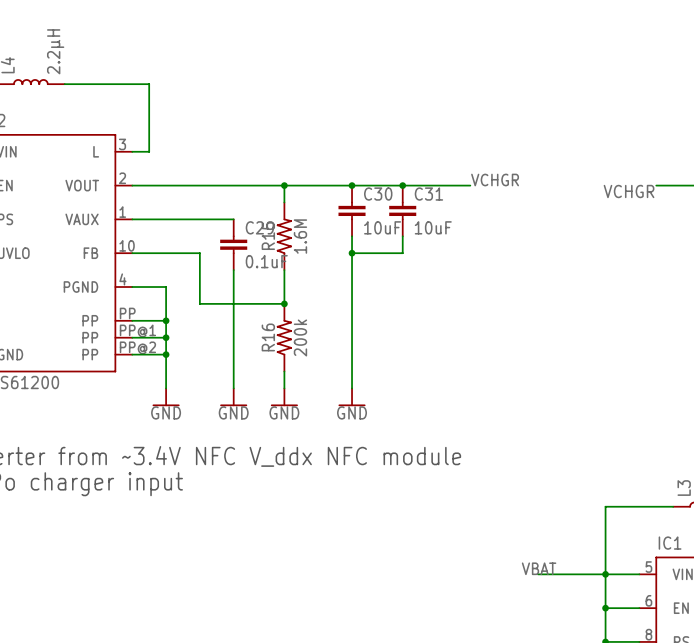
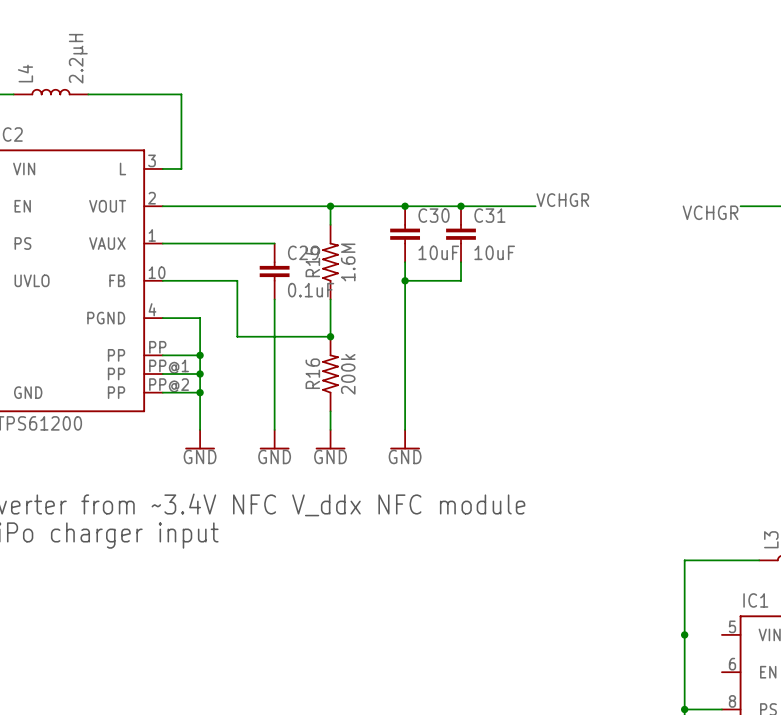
label: VBAT (539, 568) -> none
wire: (537, 574) (639, 574) -> none
wire: (605, 608) (639, 608) -> none
junction: (605, 608) -> none

